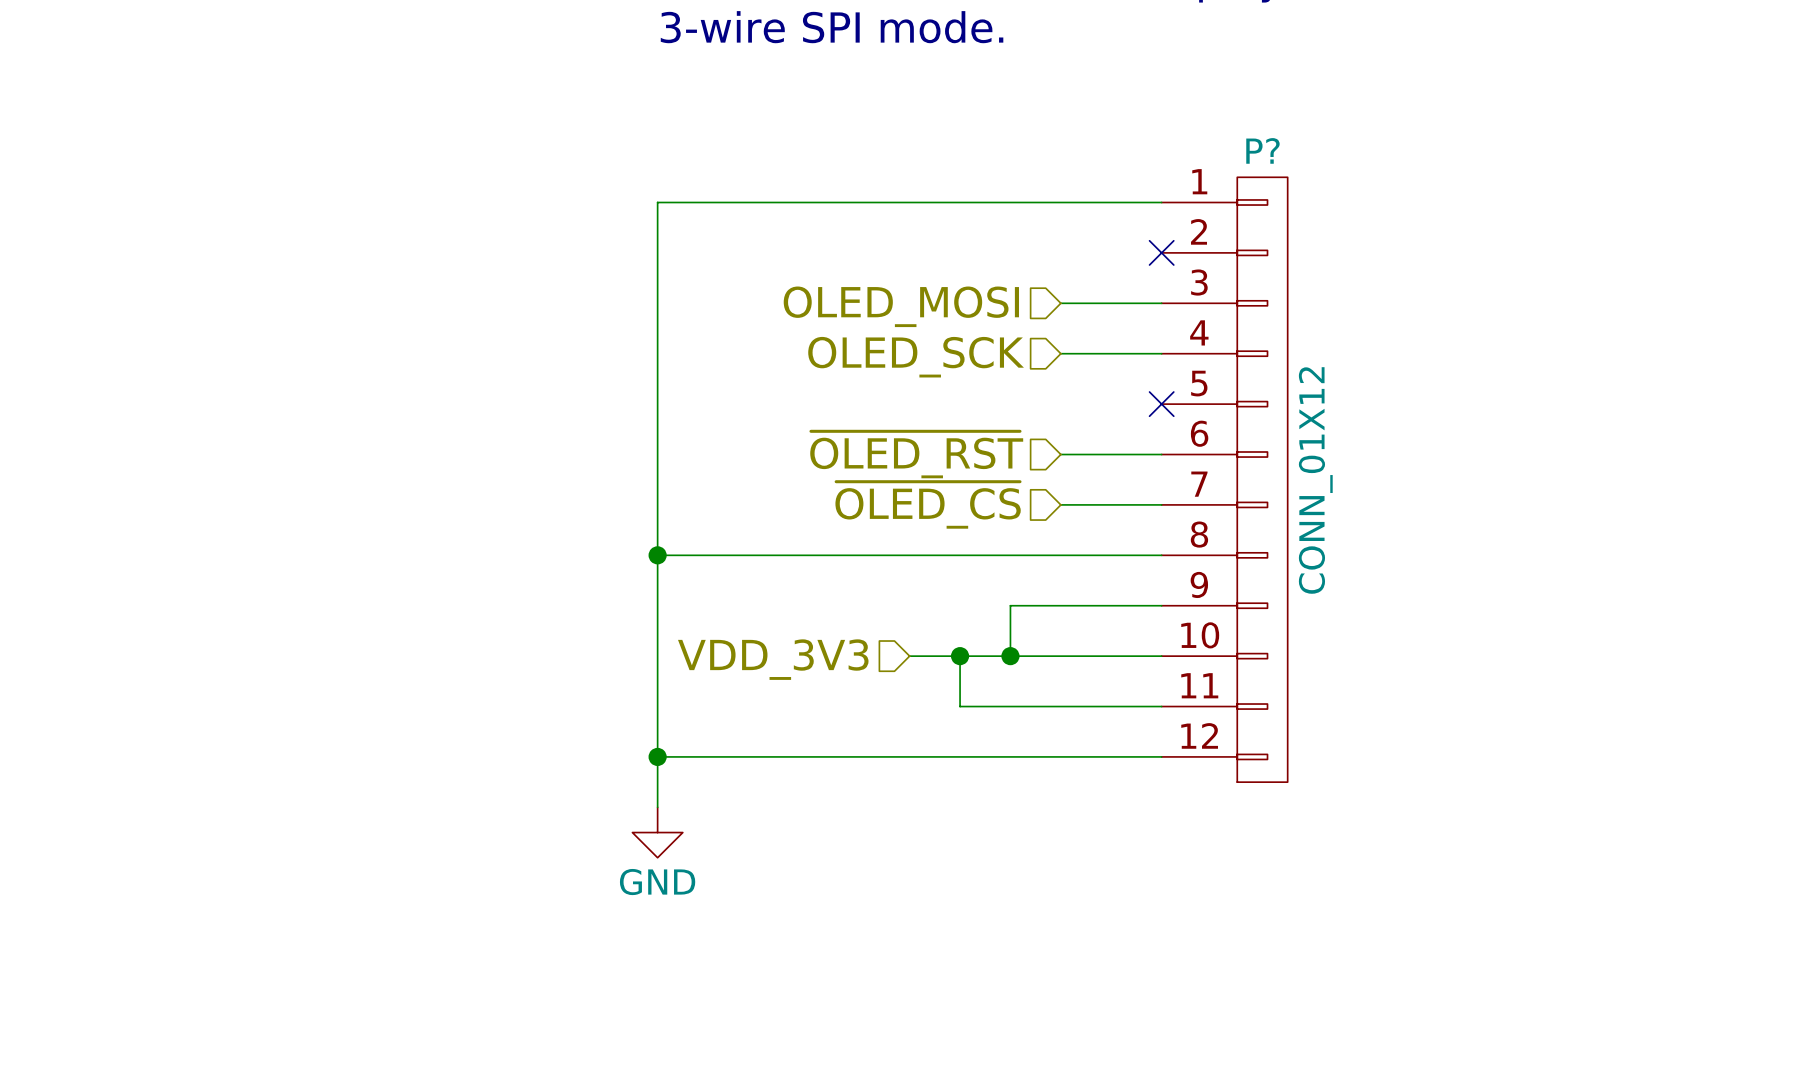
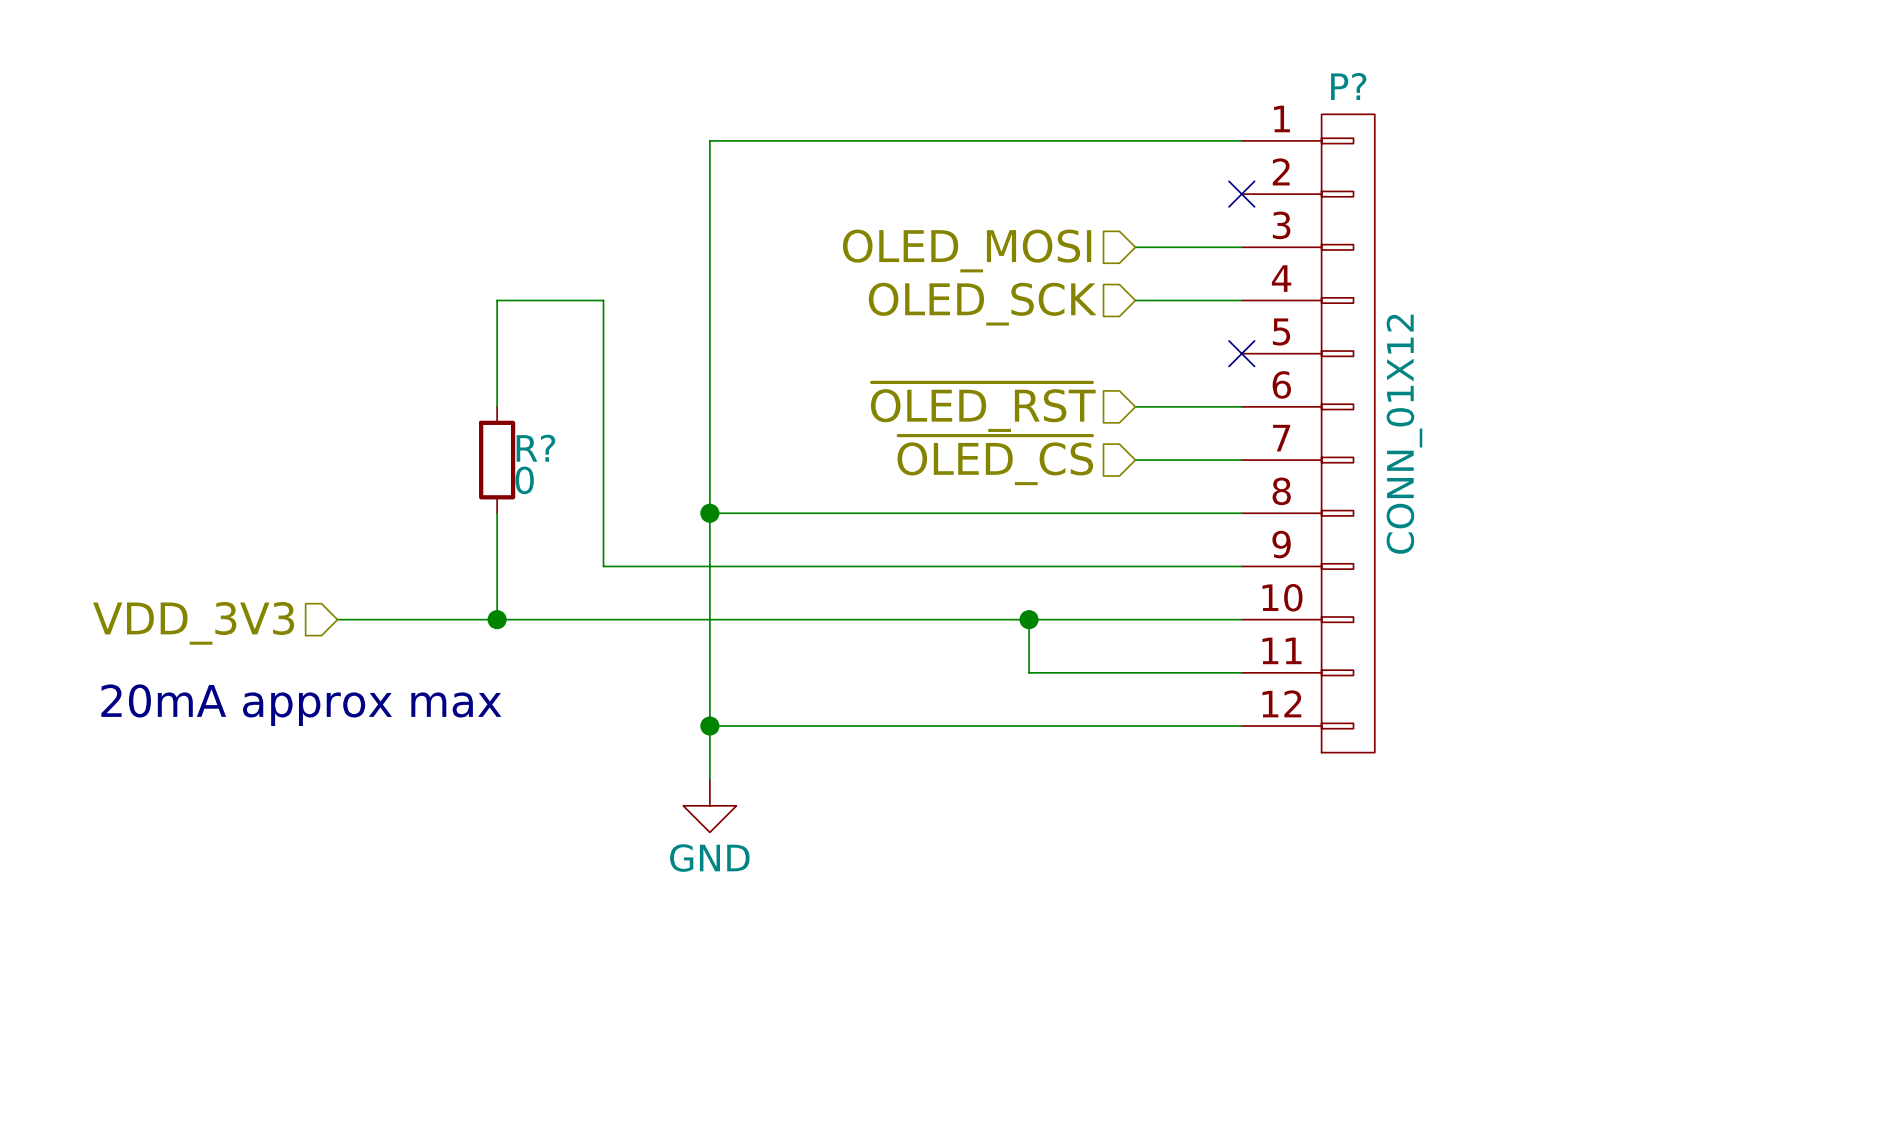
R?: none -> 0 (497, 460)
wire: none -> (497, 513) (497, 619)
wire: (1010, 605) (1010, 656) -> (1082, 566) (603, 566) (603, 300) (497, 300) (497, 406)
wire: none -> (337, 619) (975, 619)
junction: none -> (497, 619)
junction: (1010, 656) -> none
hierarchical label: none -> VDD_3V3 (193, 623)
hierarchical label: VDD_3V3 (773, 659) -> none
text: none -> 20mA approx max (301, 705)

